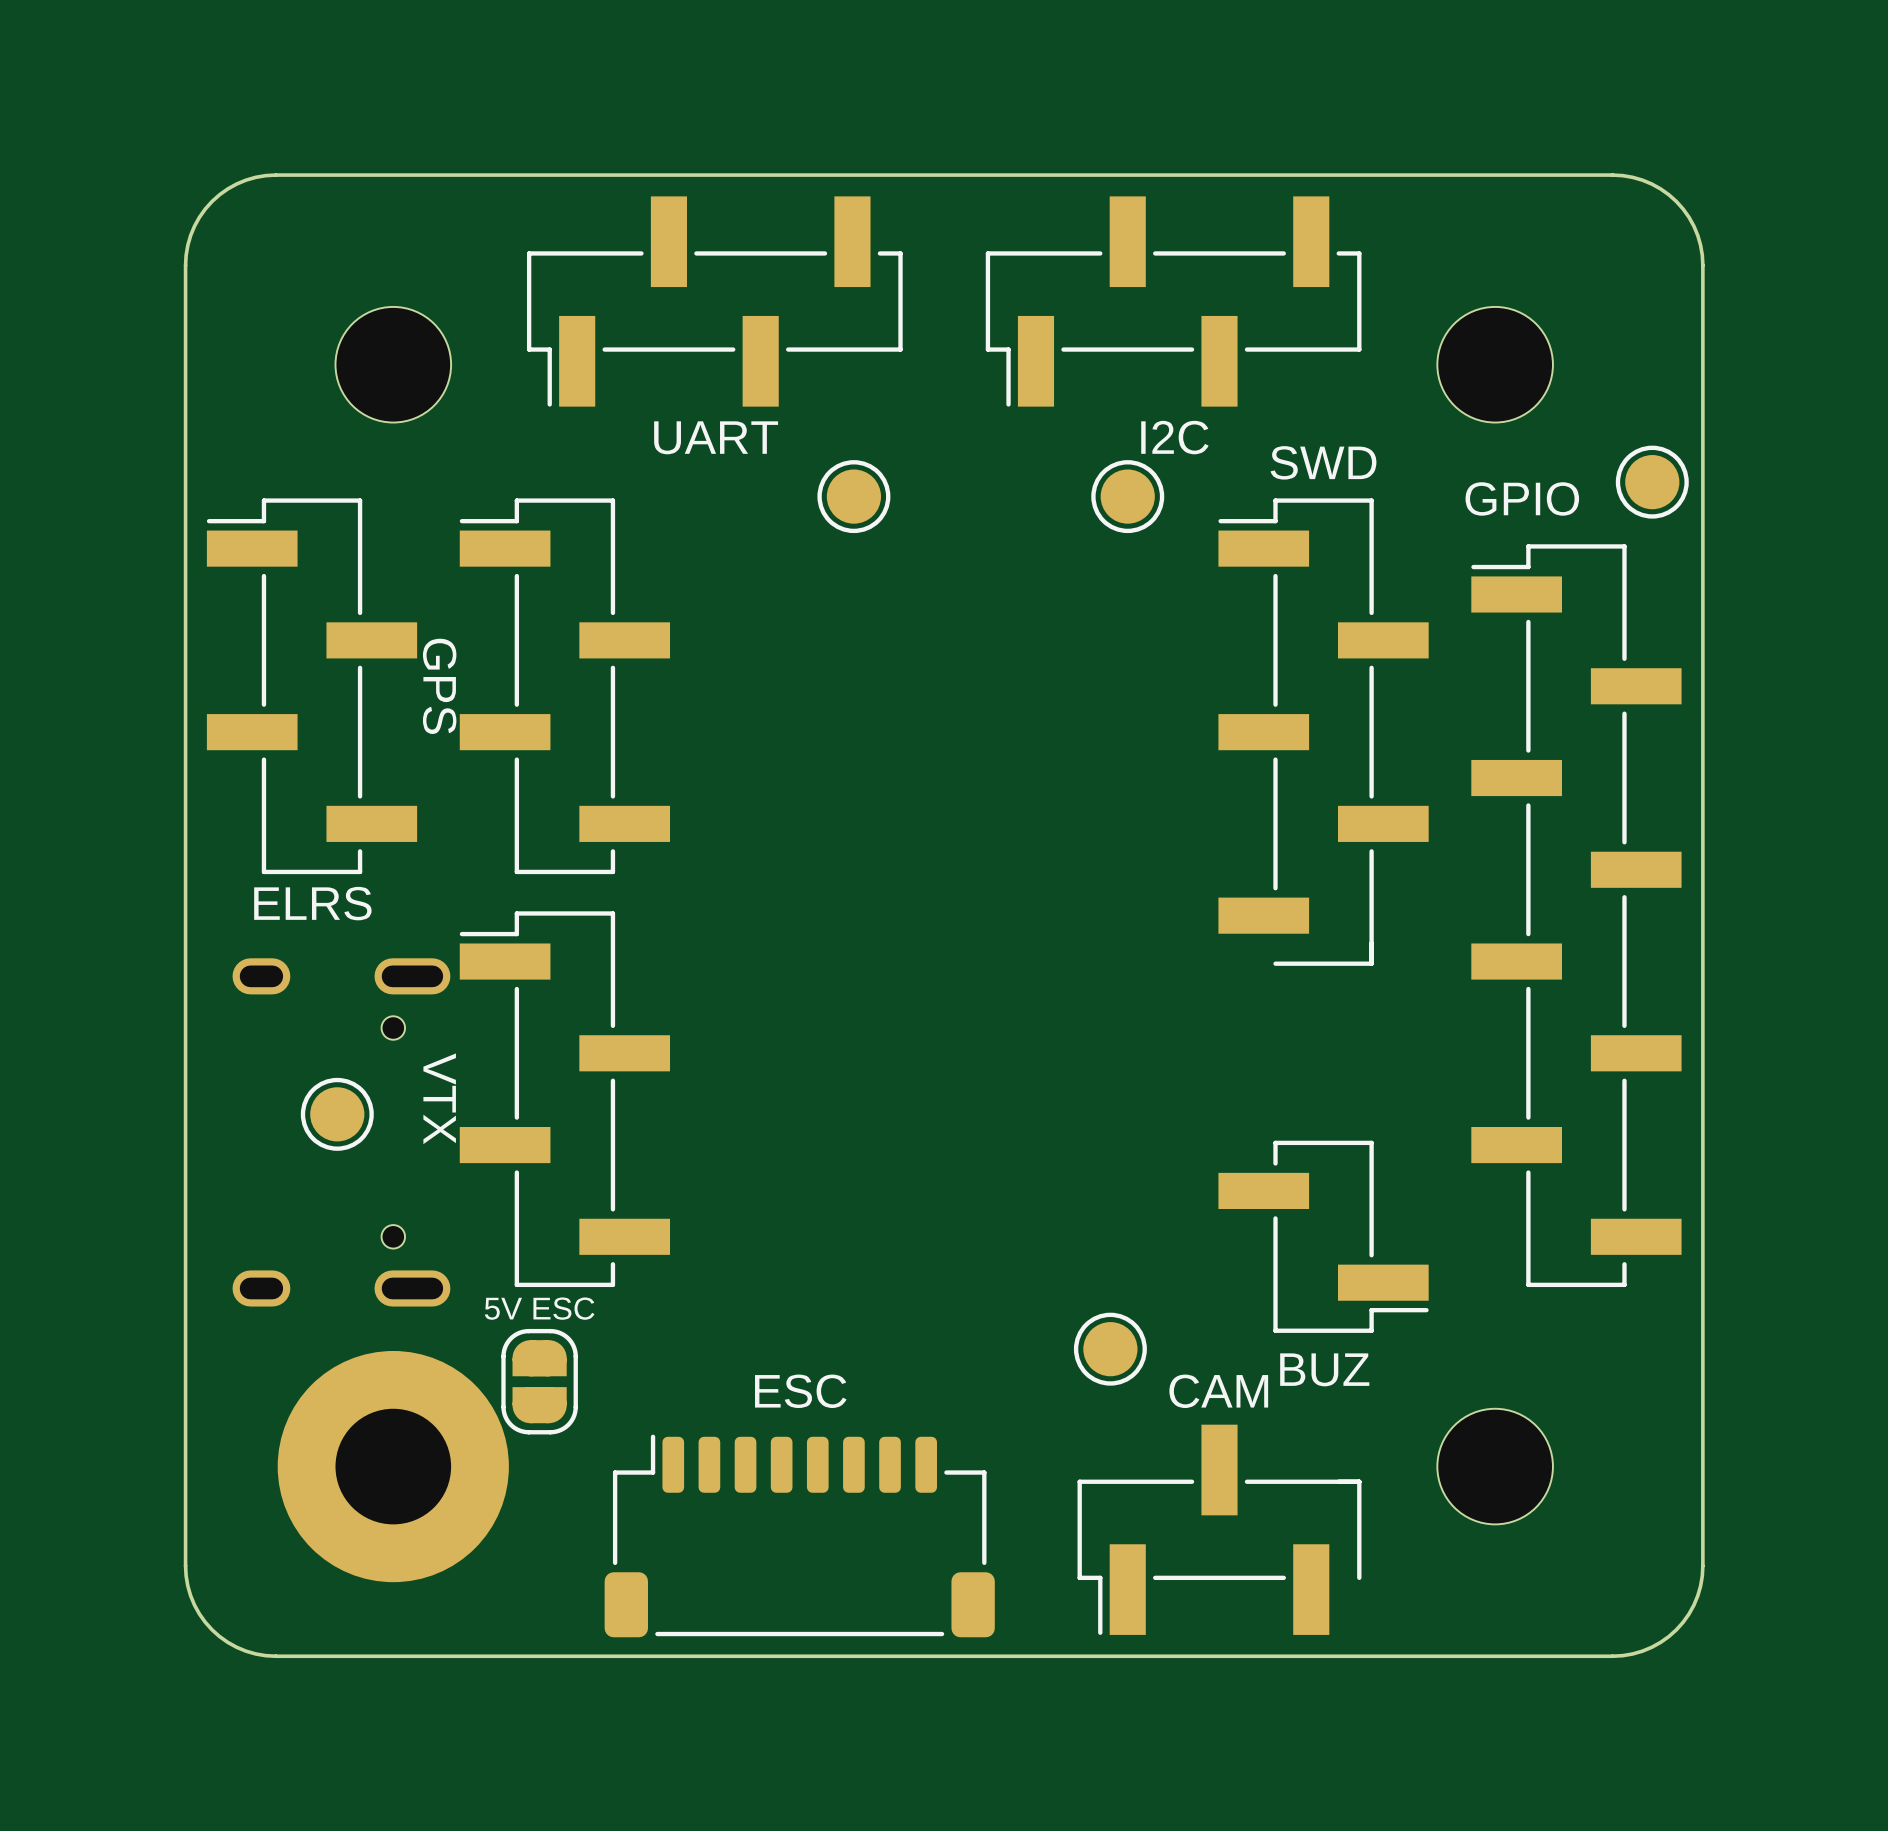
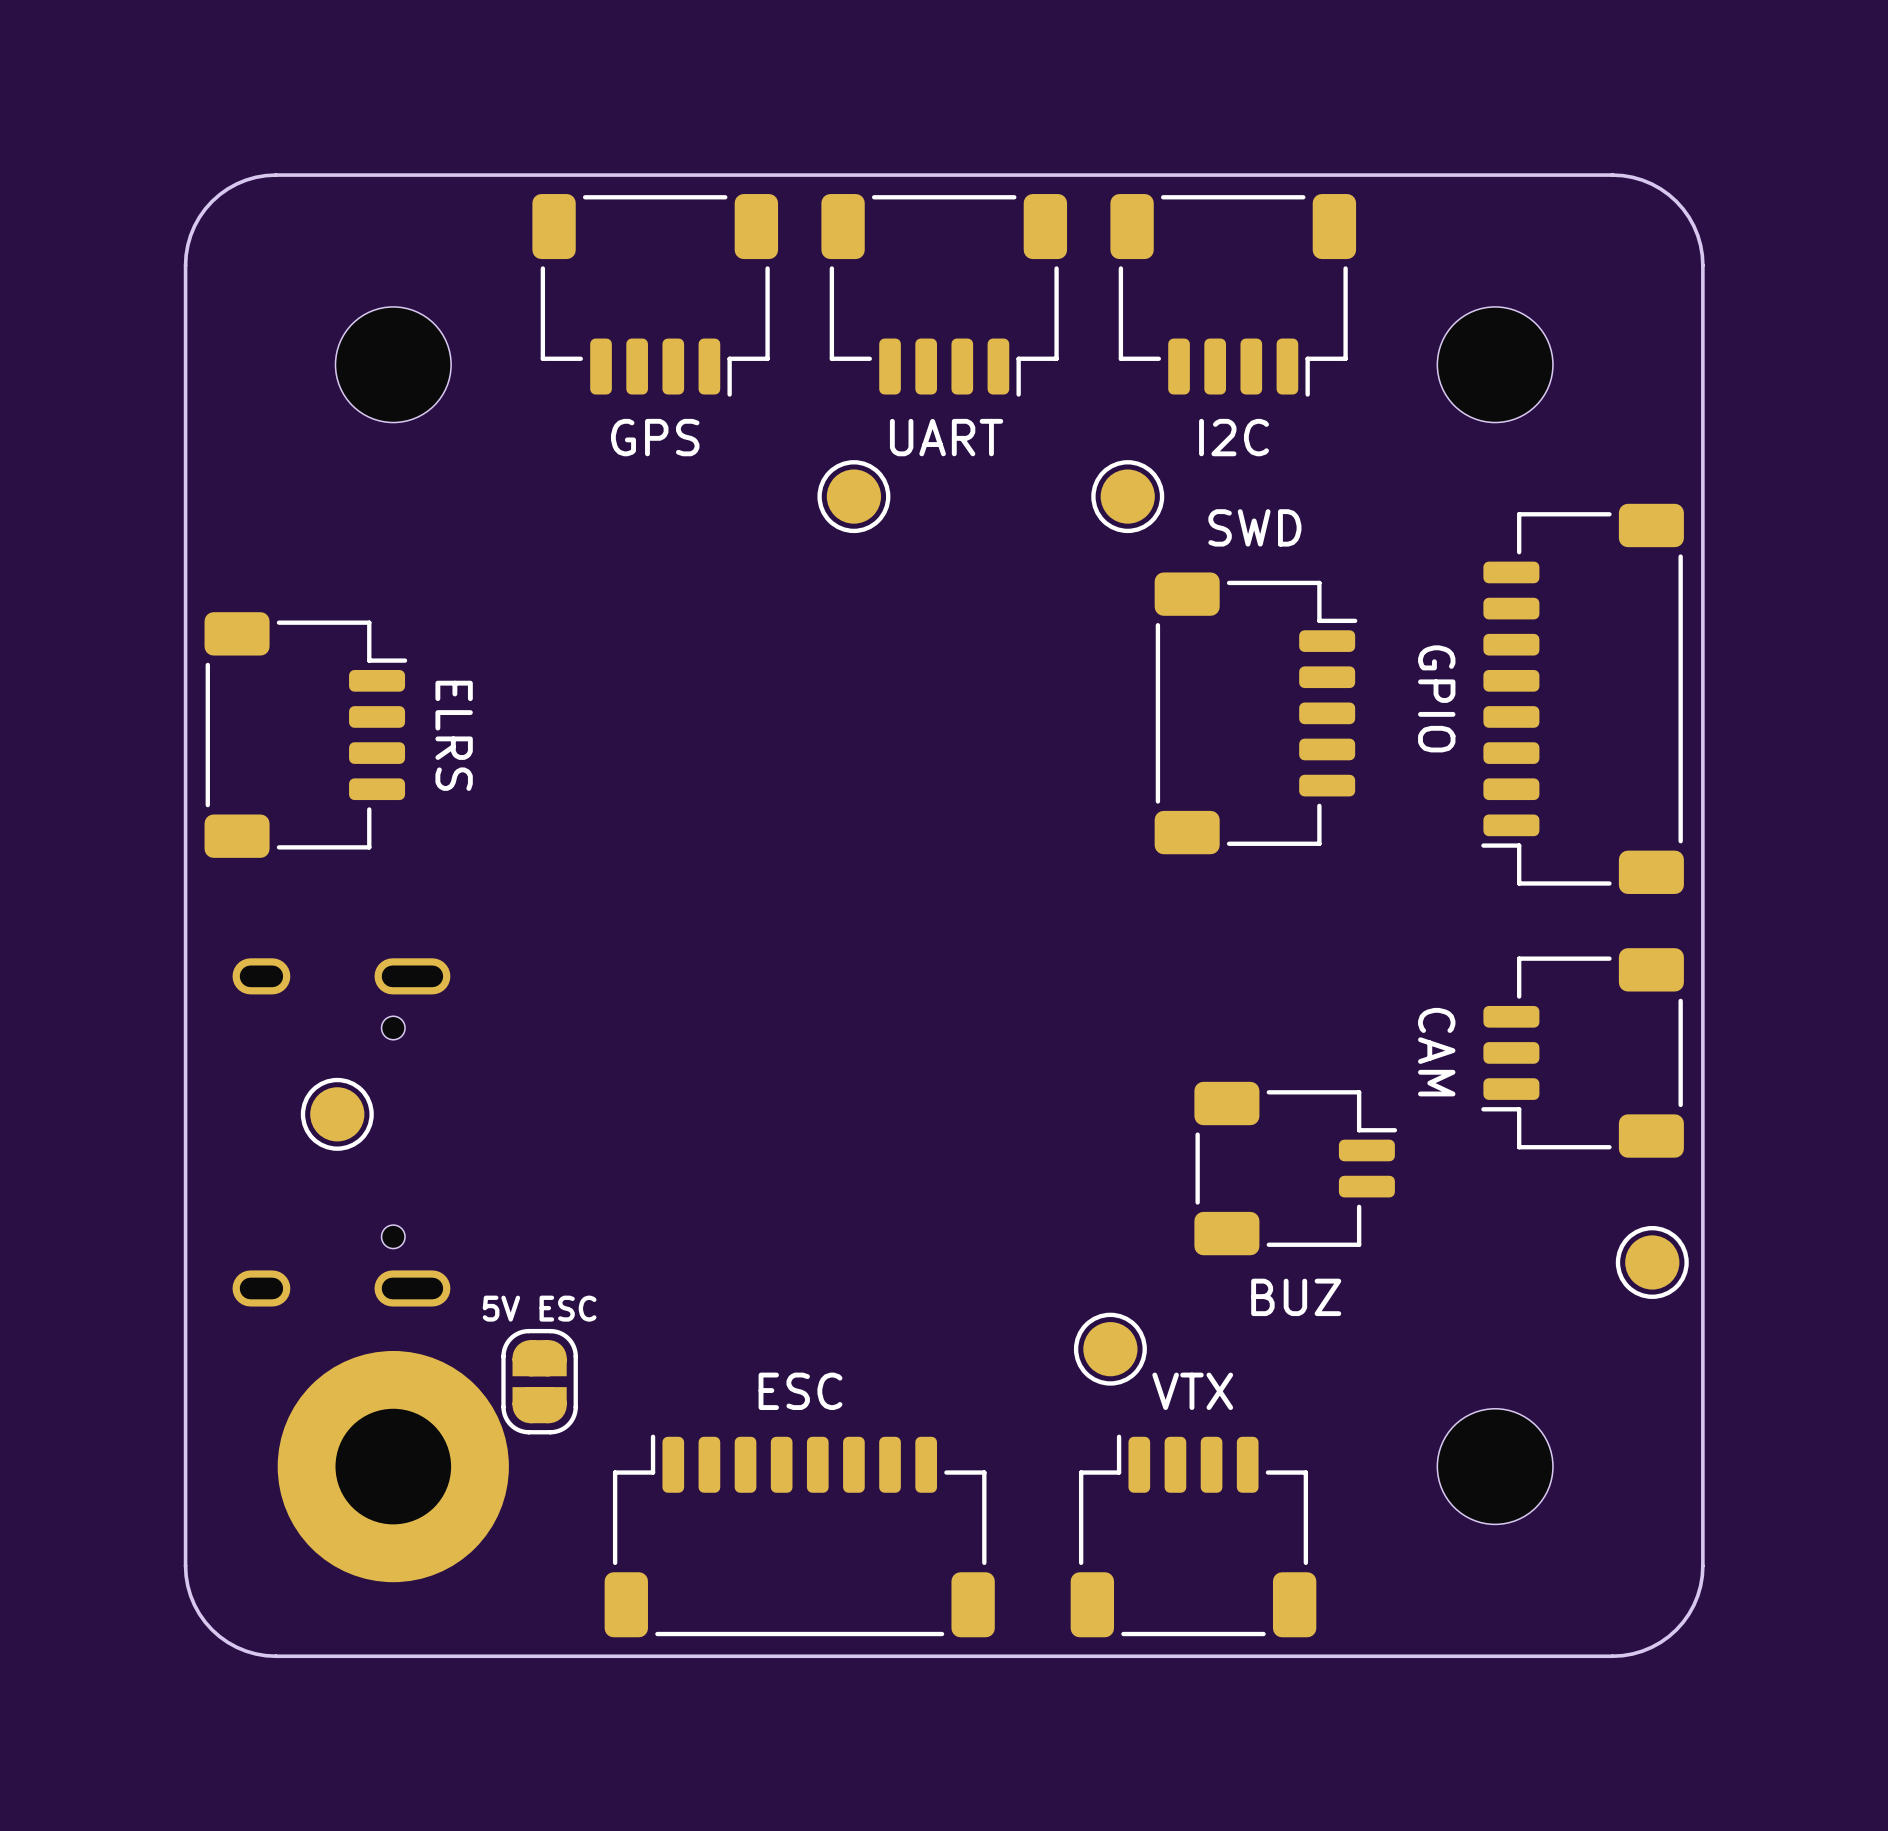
part: none -> (655, 295)
part: none -> (944, 295)
part: none -> (1233, 295)
part: (714, 301) -> none
part: (1173, 301) -> none
text position: UART (716, 437) -> UART (946, 437)
text position: I2C (1174, 437) -> I2C (1234, 437)
text position: SWD (1323, 462) -> SWD (1254, 527)
part position: (1652, 482) -> (1652, 1262)
text rotation: 0° (1522, 498) -> 90° clockwise (1436, 698)
text position: GPIO (1522, 498) -> GPIO (1436, 698)
part: (312, 686) -> none
text rotation: 0° (439, 686) -> 90° counterclockwise (655, 437)
text position: GPS (439, 686) -> GPS (655, 437)
part: (564, 686) -> none
part: none -> (1582, 698)
part: none -> (1255, 713)
part: (1323, 732) -> none
part: none -> (305, 735)
text rotation: 0° (312, 903) -> 90° clockwise (454, 735)
text position: ELRS (312, 903) -> ELRS (454, 735)
part: (1576, 915) -> none
part: none -> (1582, 1052)
text rotation: 0° (439, 1098) -> 90° counterclockwise (1192, 1391)
text position: VTX (439, 1098) -> VTX (1192, 1391)
part: (564, 1099) -> none
part: none -> (1295, 1168)
part: (1323, 1236) -> none
text position: BUZ (1324, 1369) -> BUZ (1296, 1297)
text rotation: 0° (1218, 1391) -> 90° clockwise (1436, 1052)
text position: CAM (1218, 1391) -> CAM (1436, 1052)
part footprint: [1077, 1424, 1362, 1635] -> [1070, 1434, 1317, 1638]

